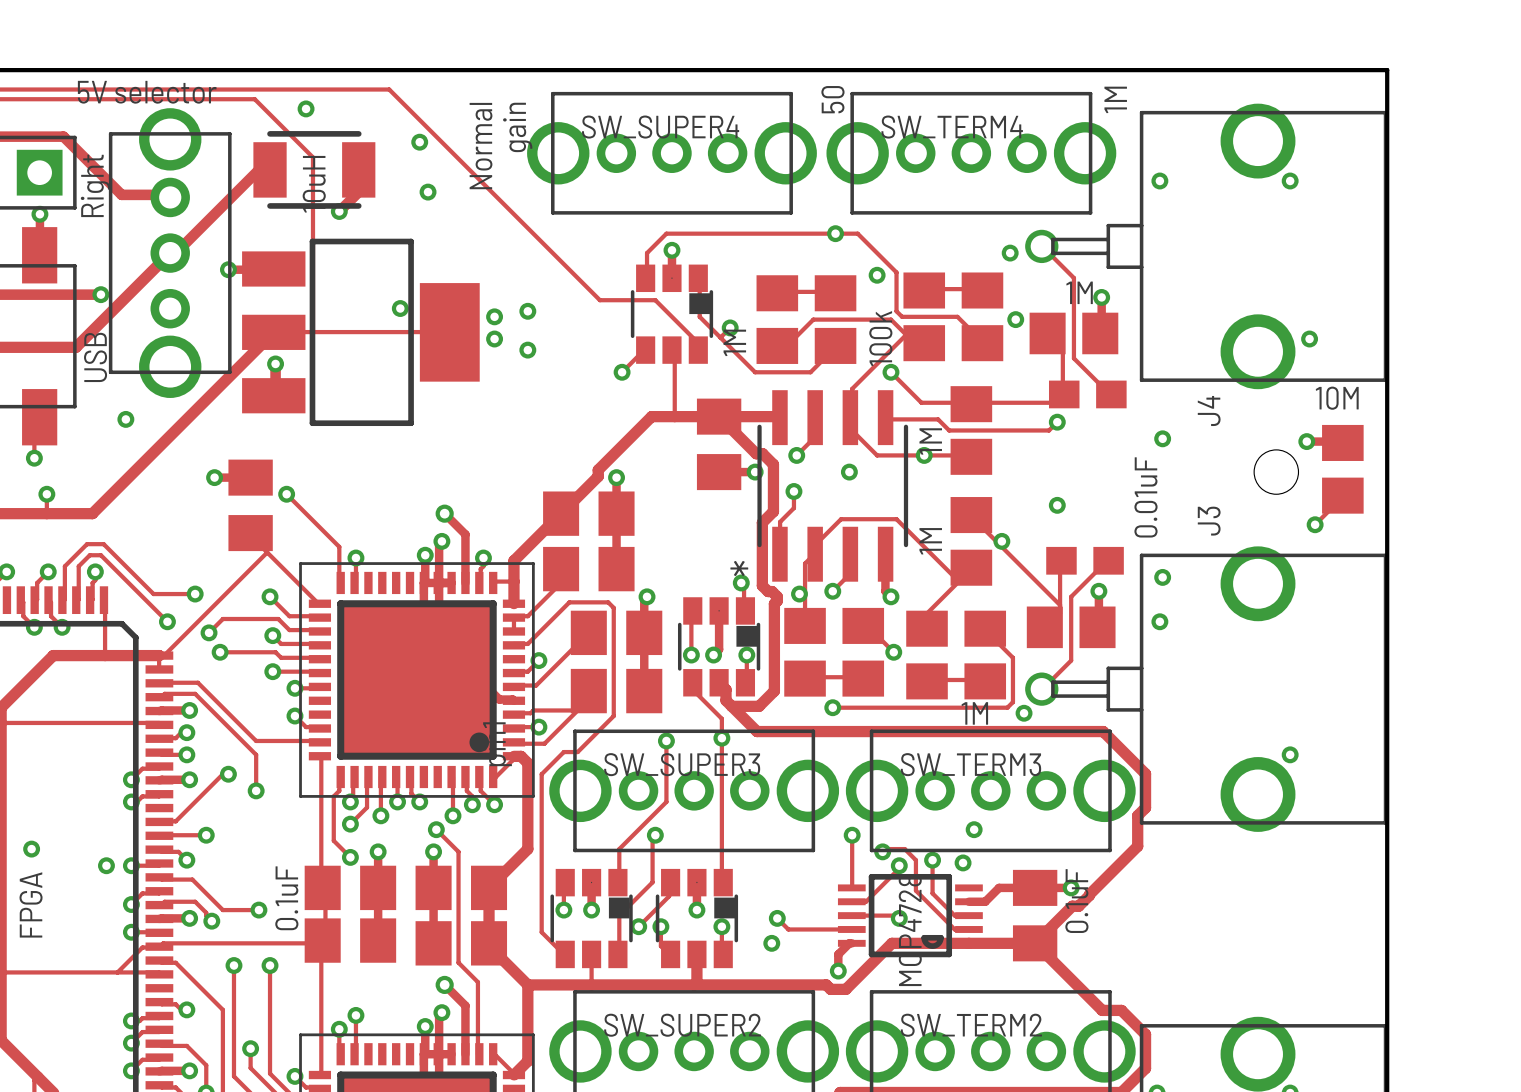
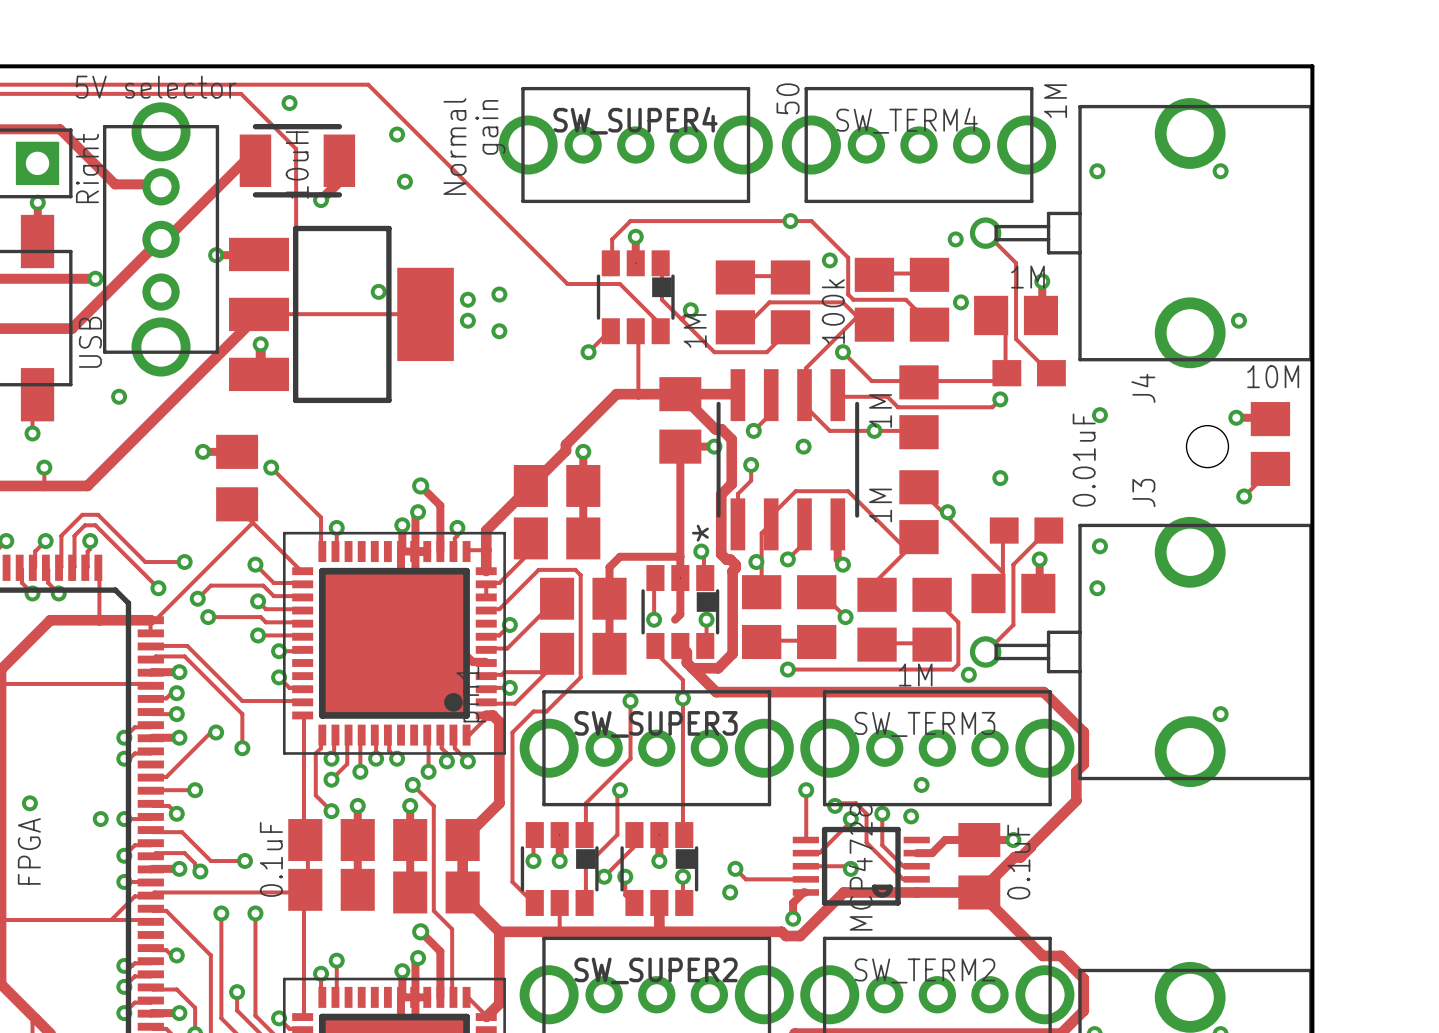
track: none -> (680, 446) (680, 578)
track: none -> (680, 556) (620, 556) (612, 564)
via: (647, 596) -> none
via: (713, 655) -> none

